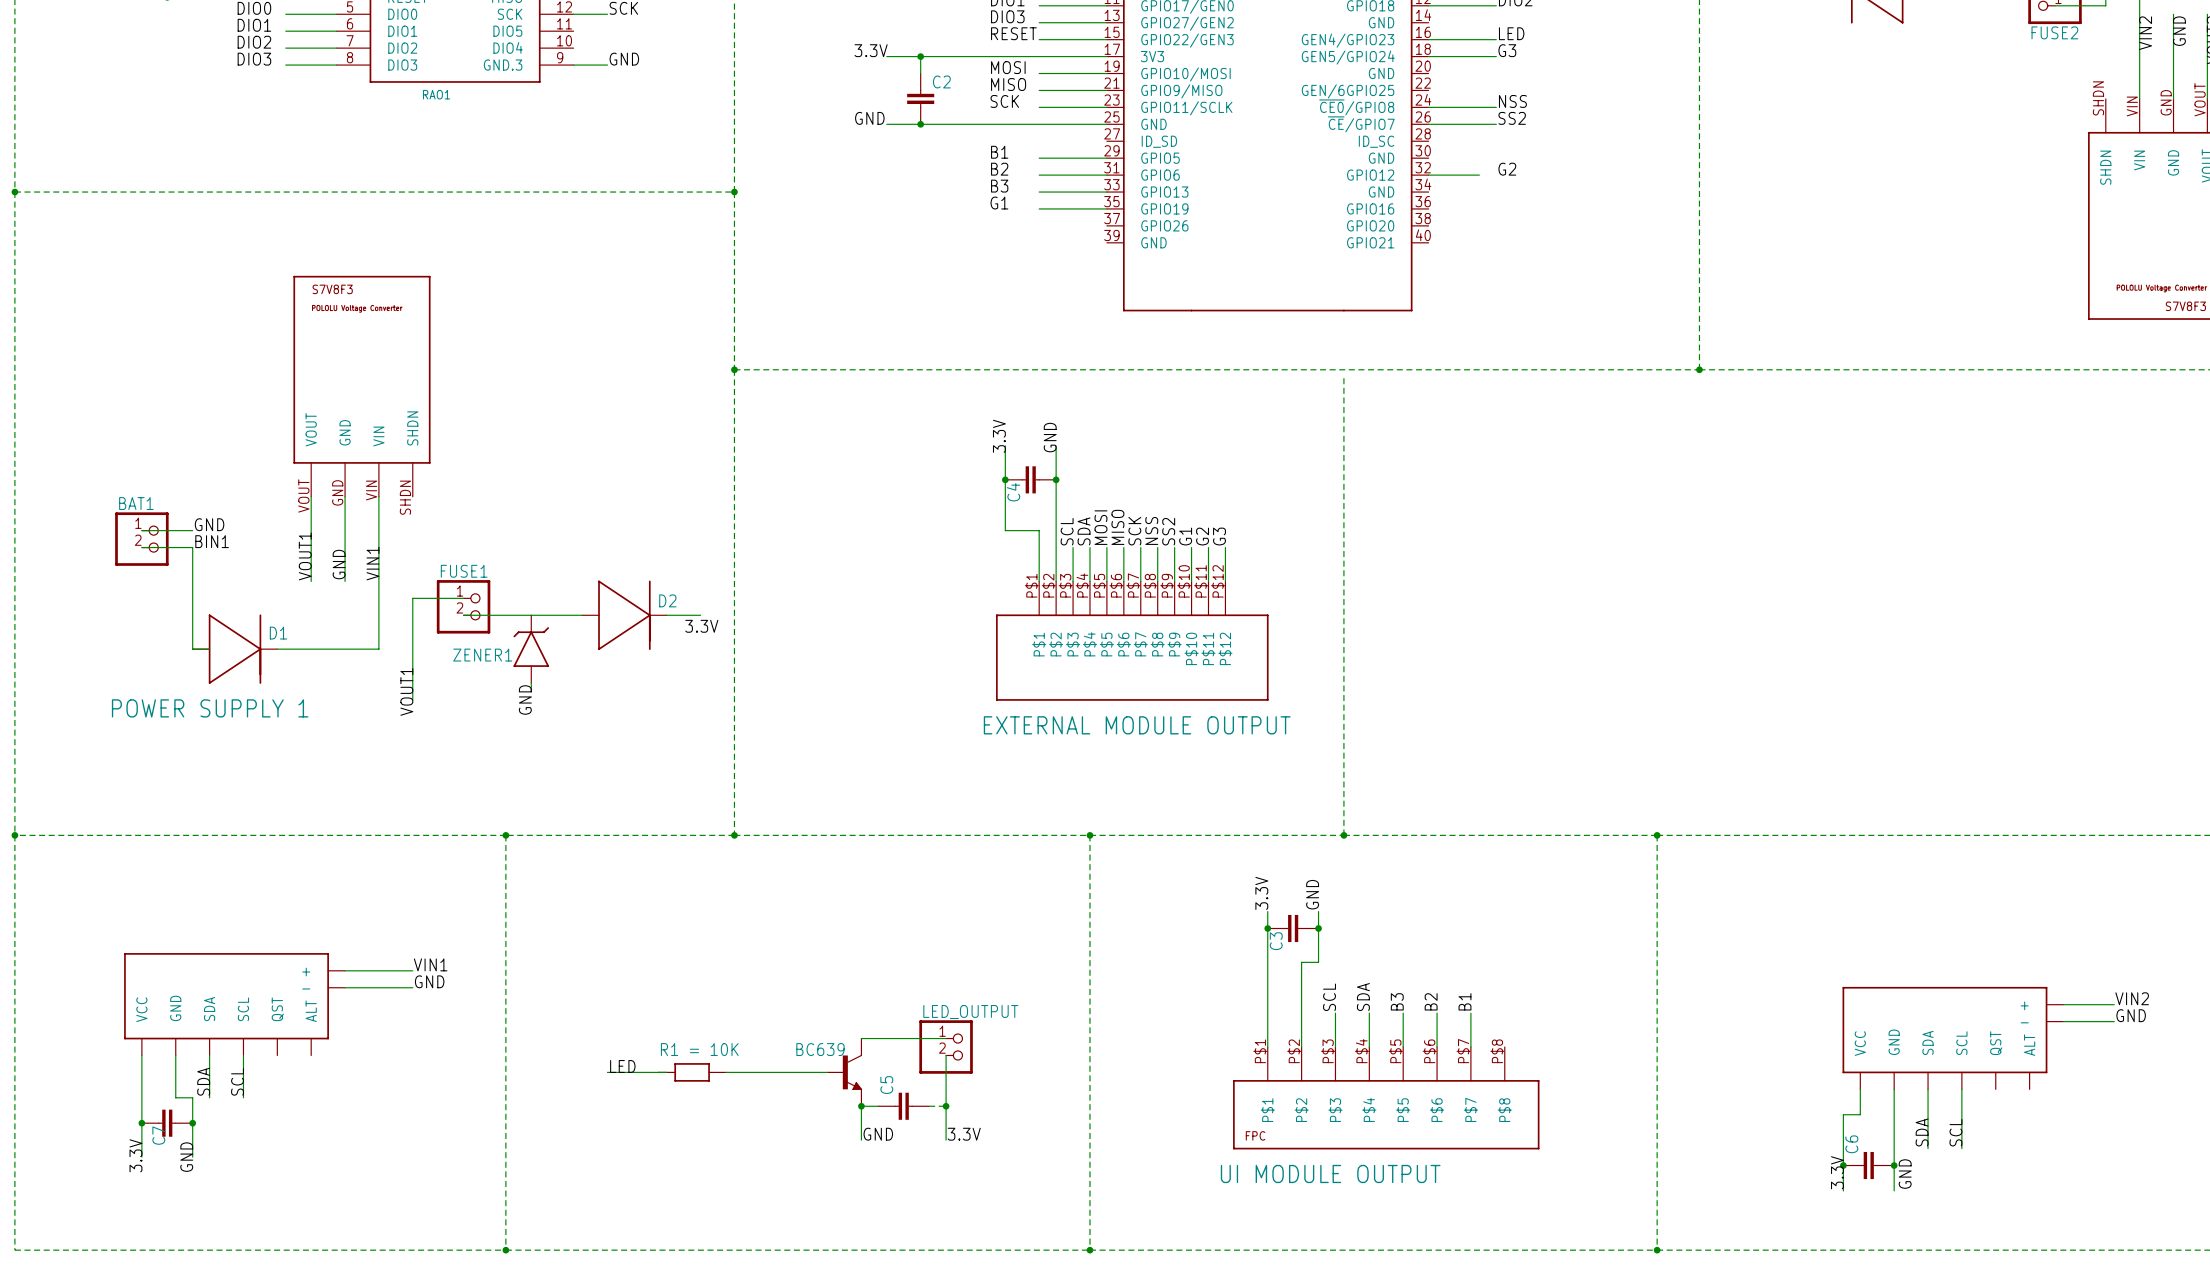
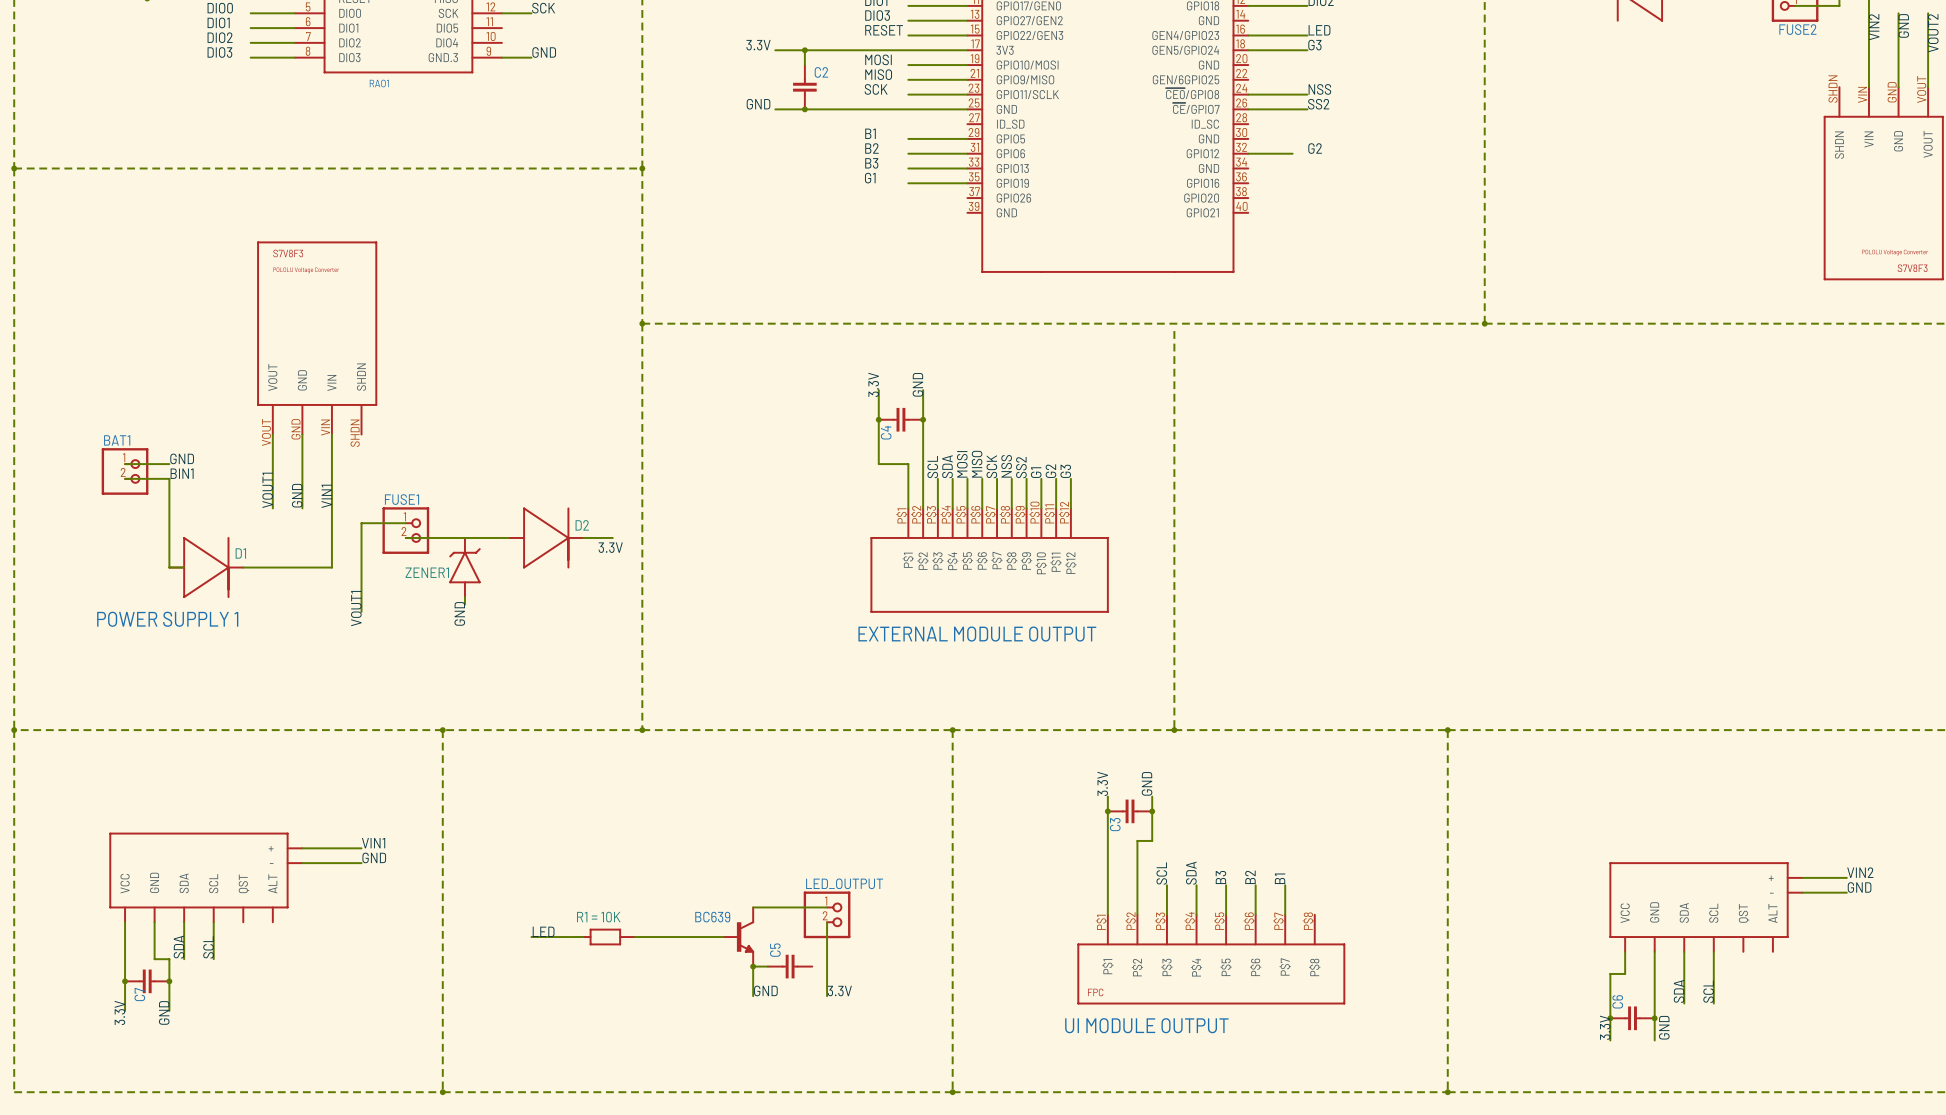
wire: (929, 1106) (946, 1106) -> none
junction: (946, 1106) -> none

